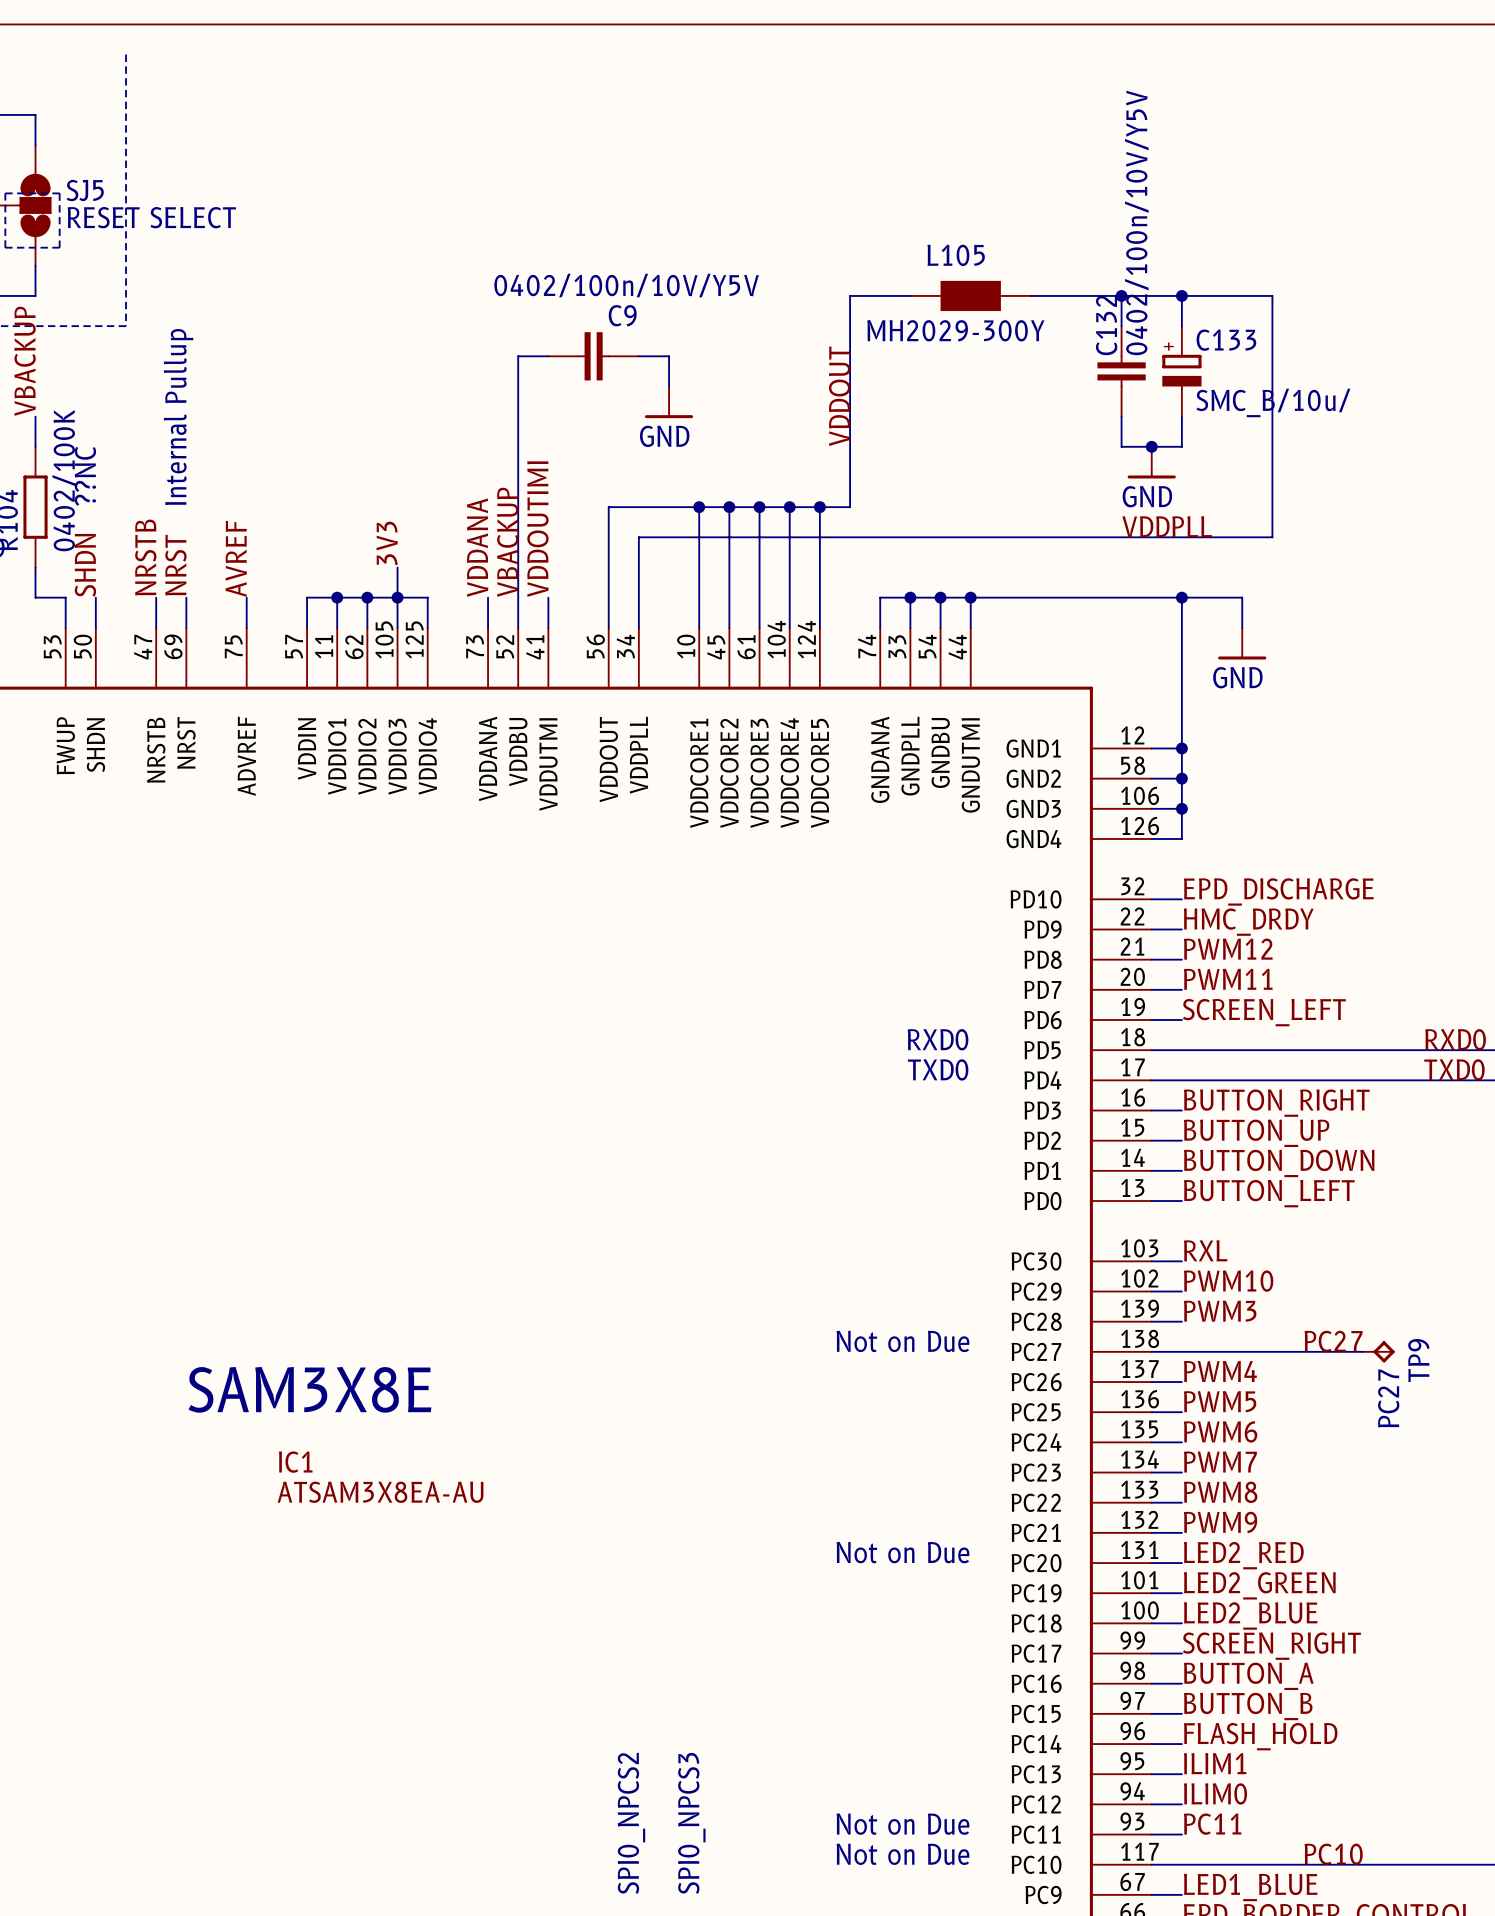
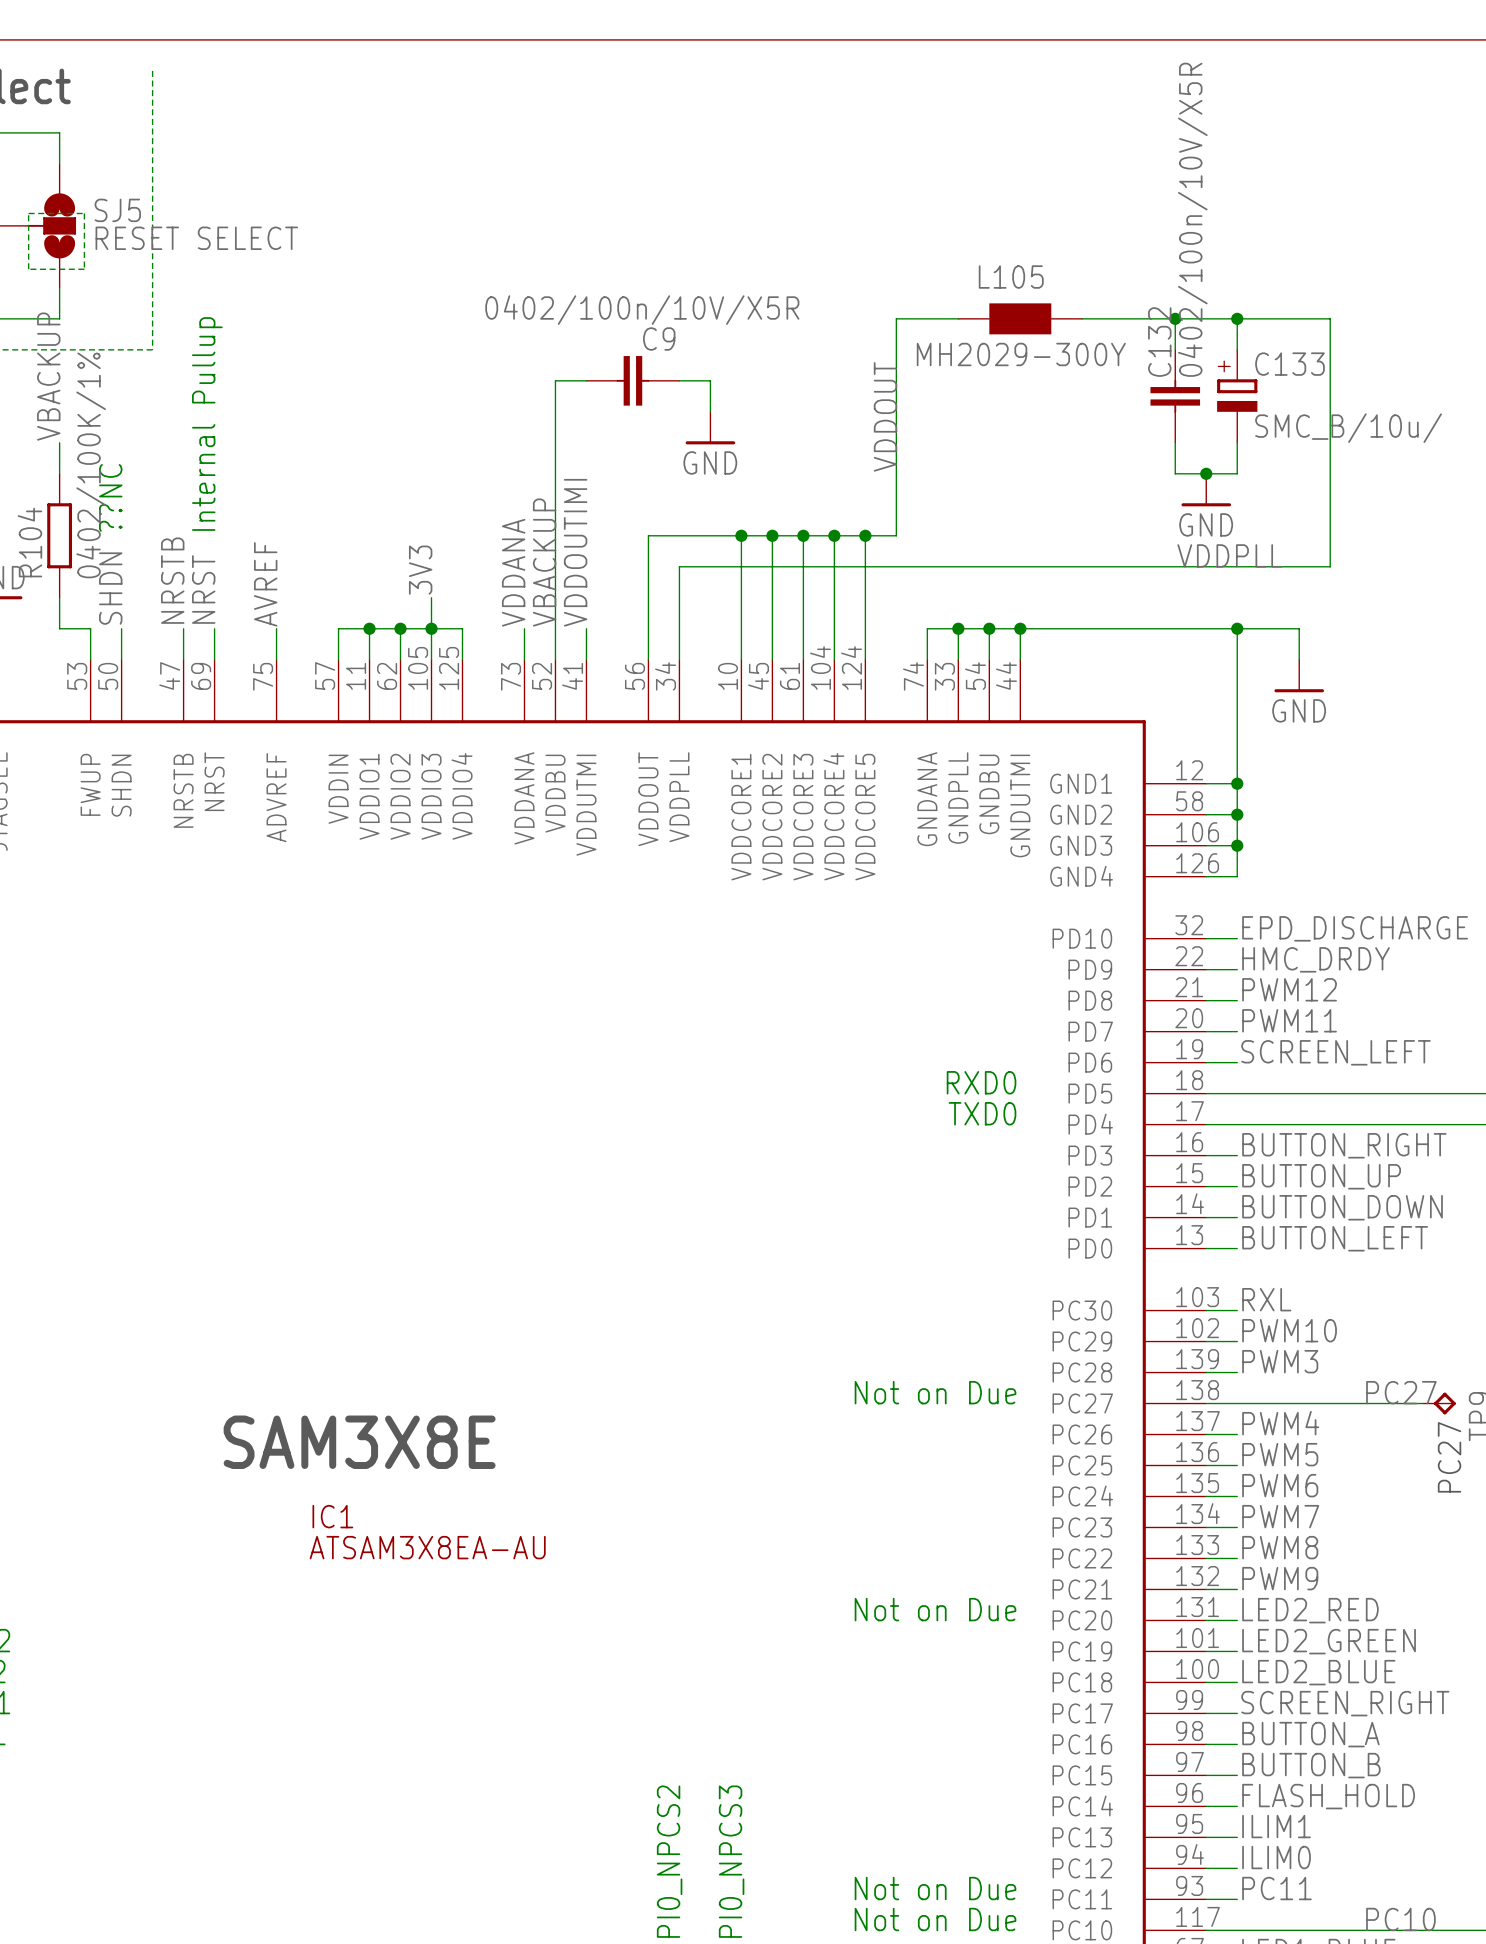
C132 value: 0402/100n/10V/Y5V (1136, 222) -> 0402/100n/10V/X5R (1192, 219)
C9 value: 0402/100n/10V/Y5V (626, 285) -> 0402/100n/10V/X5R (642, 310)
R104 value: 0402/100K (64, 480) -> 0402/100K/1% (91, 465)

